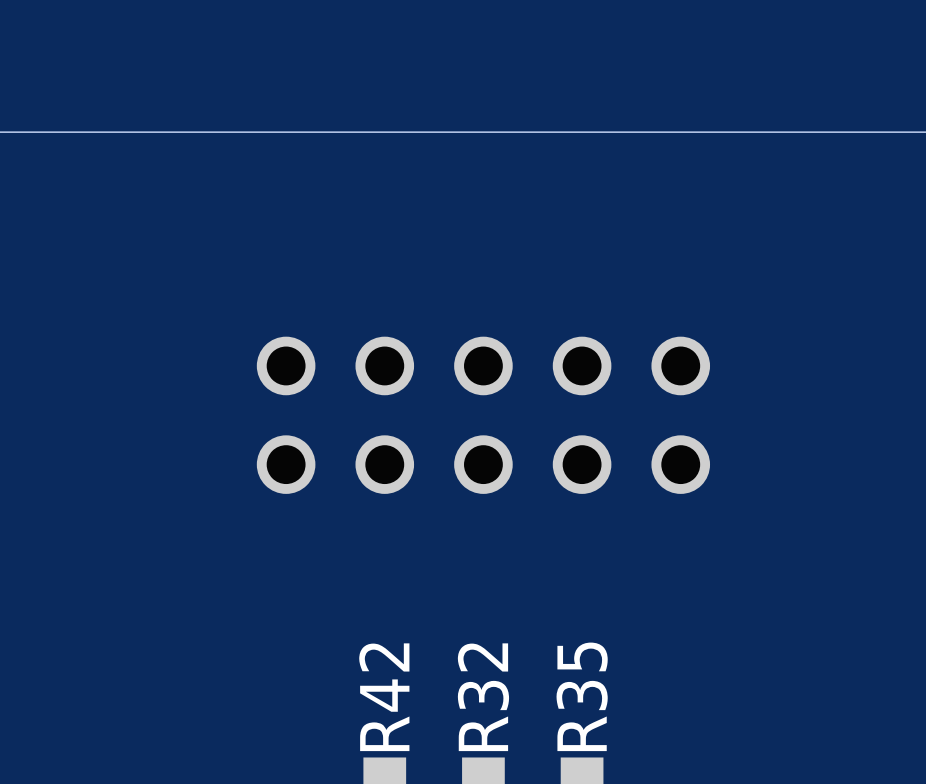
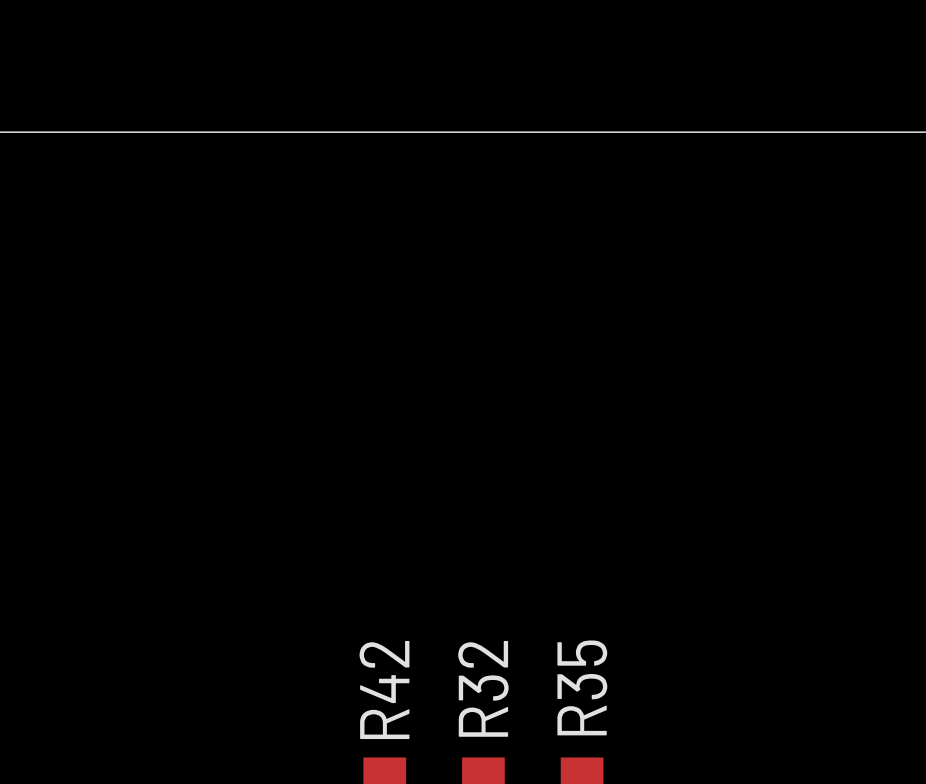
part: (483, 415) -> none

